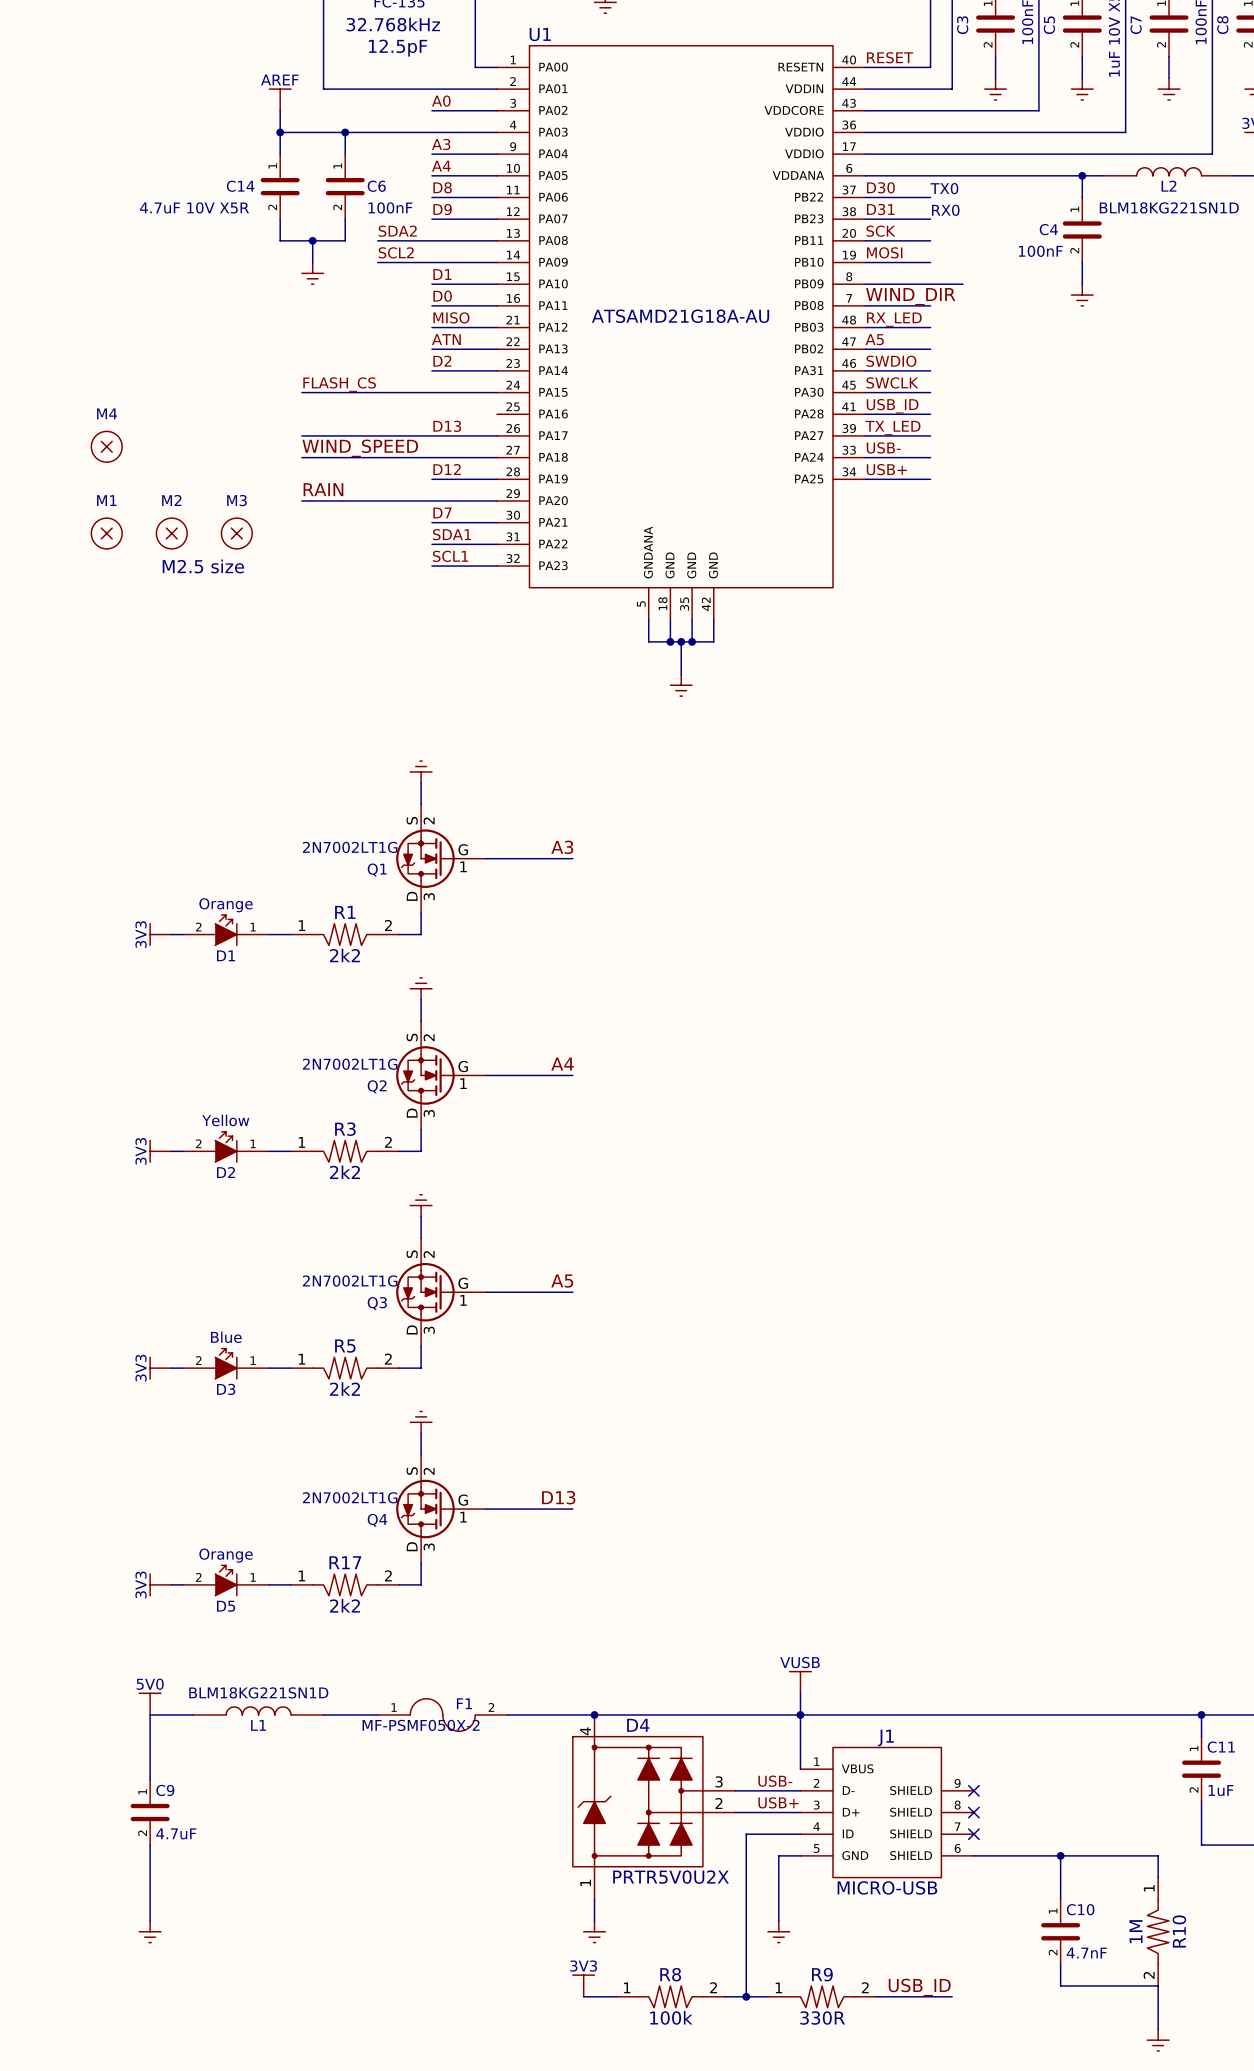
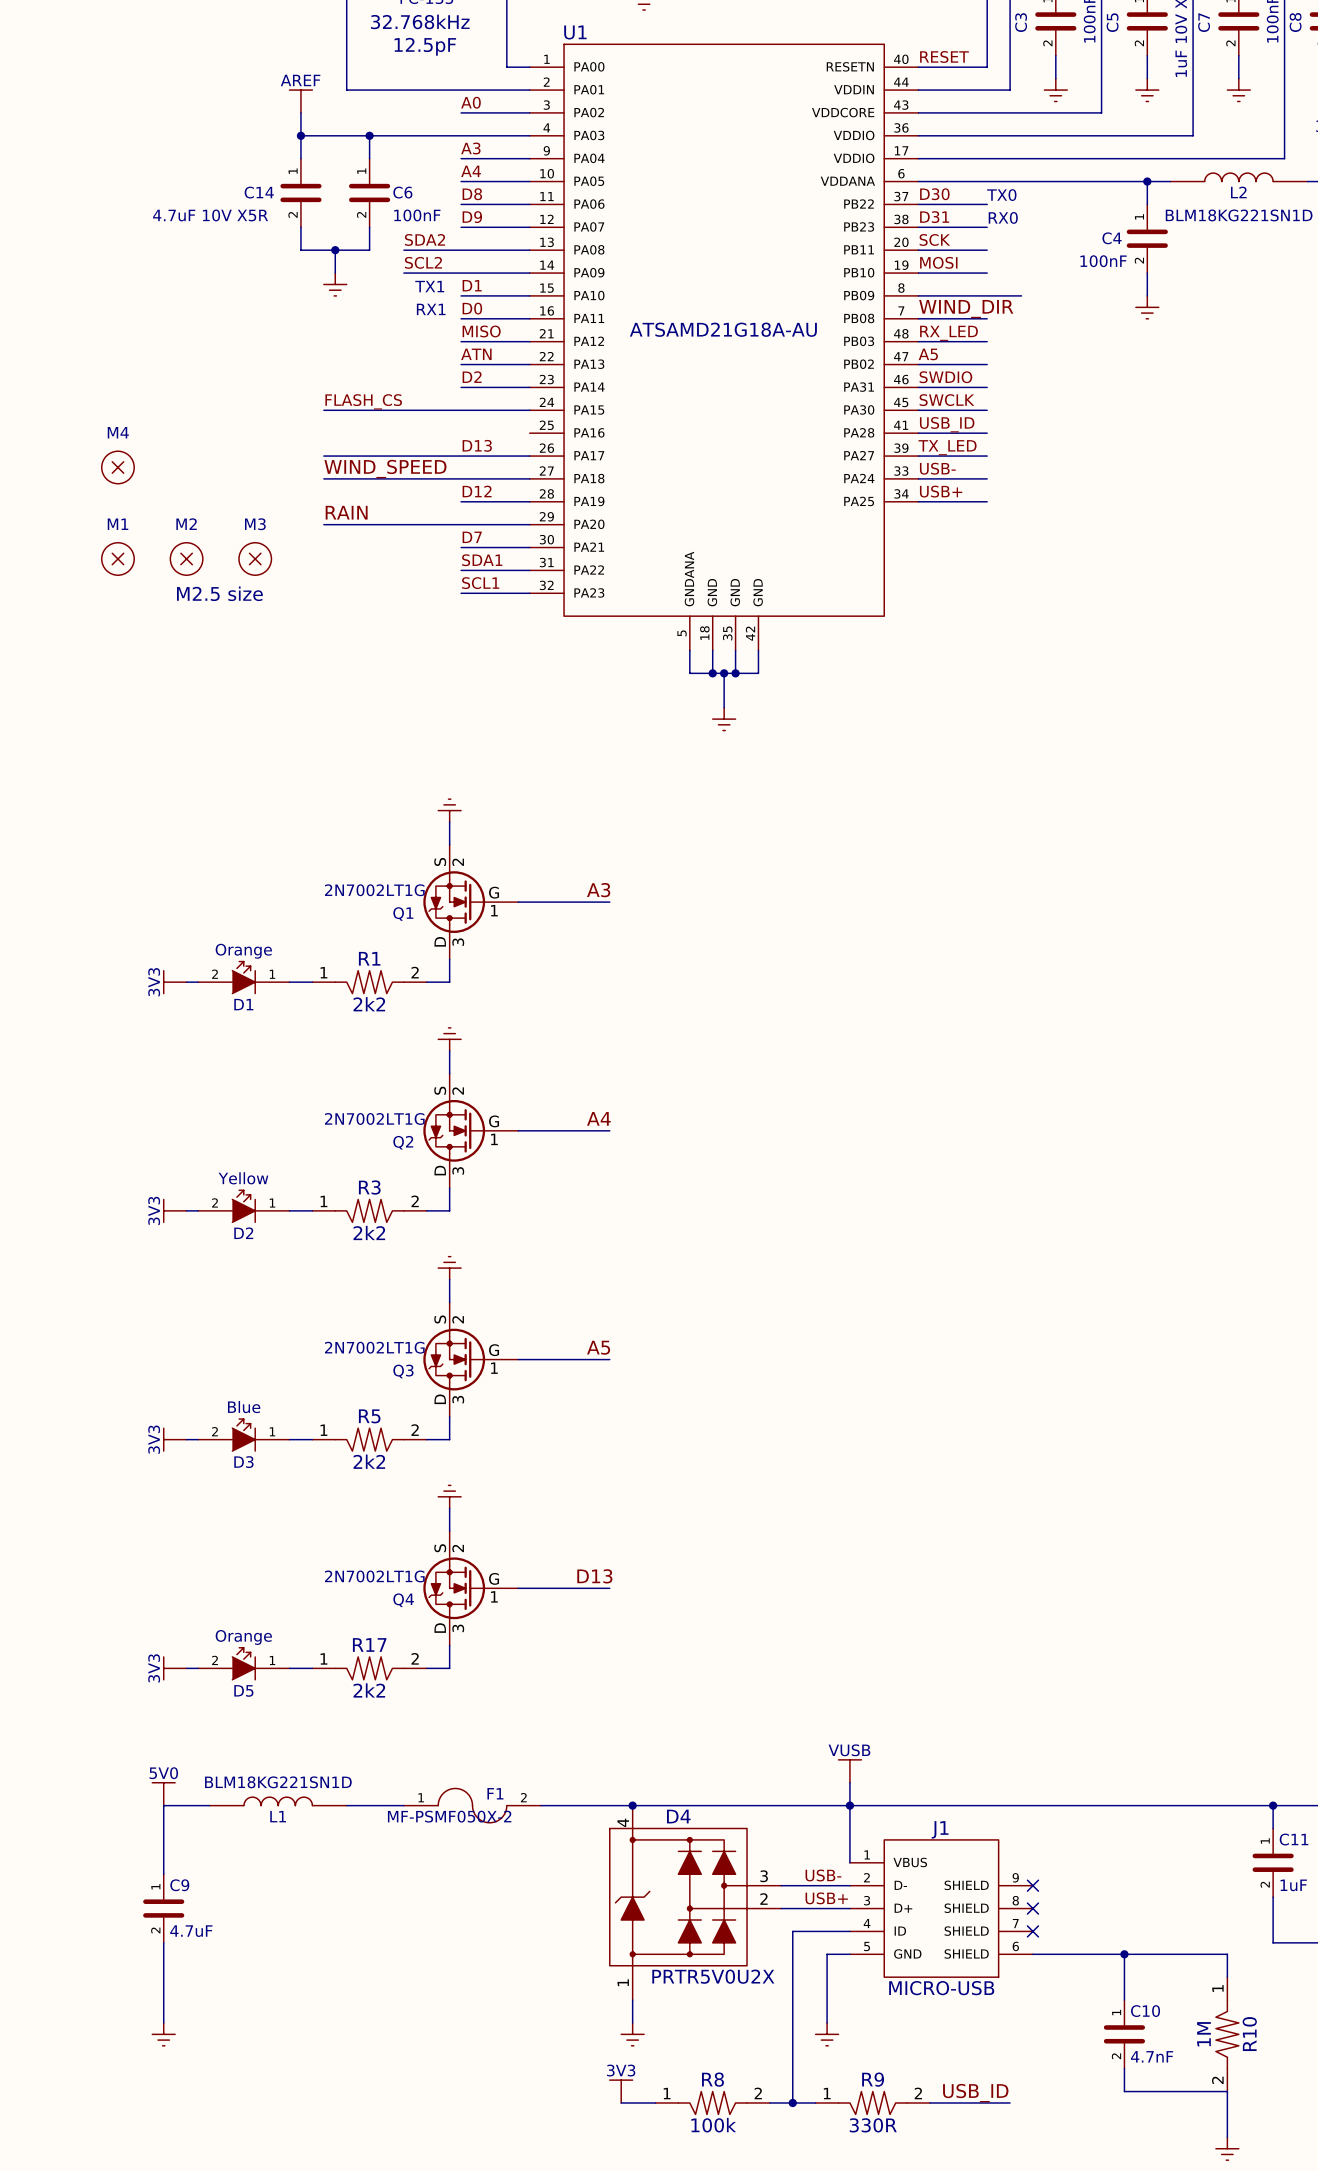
text: none -> TX1 (429, 286)
text: none -> RX1 (431, 309)

